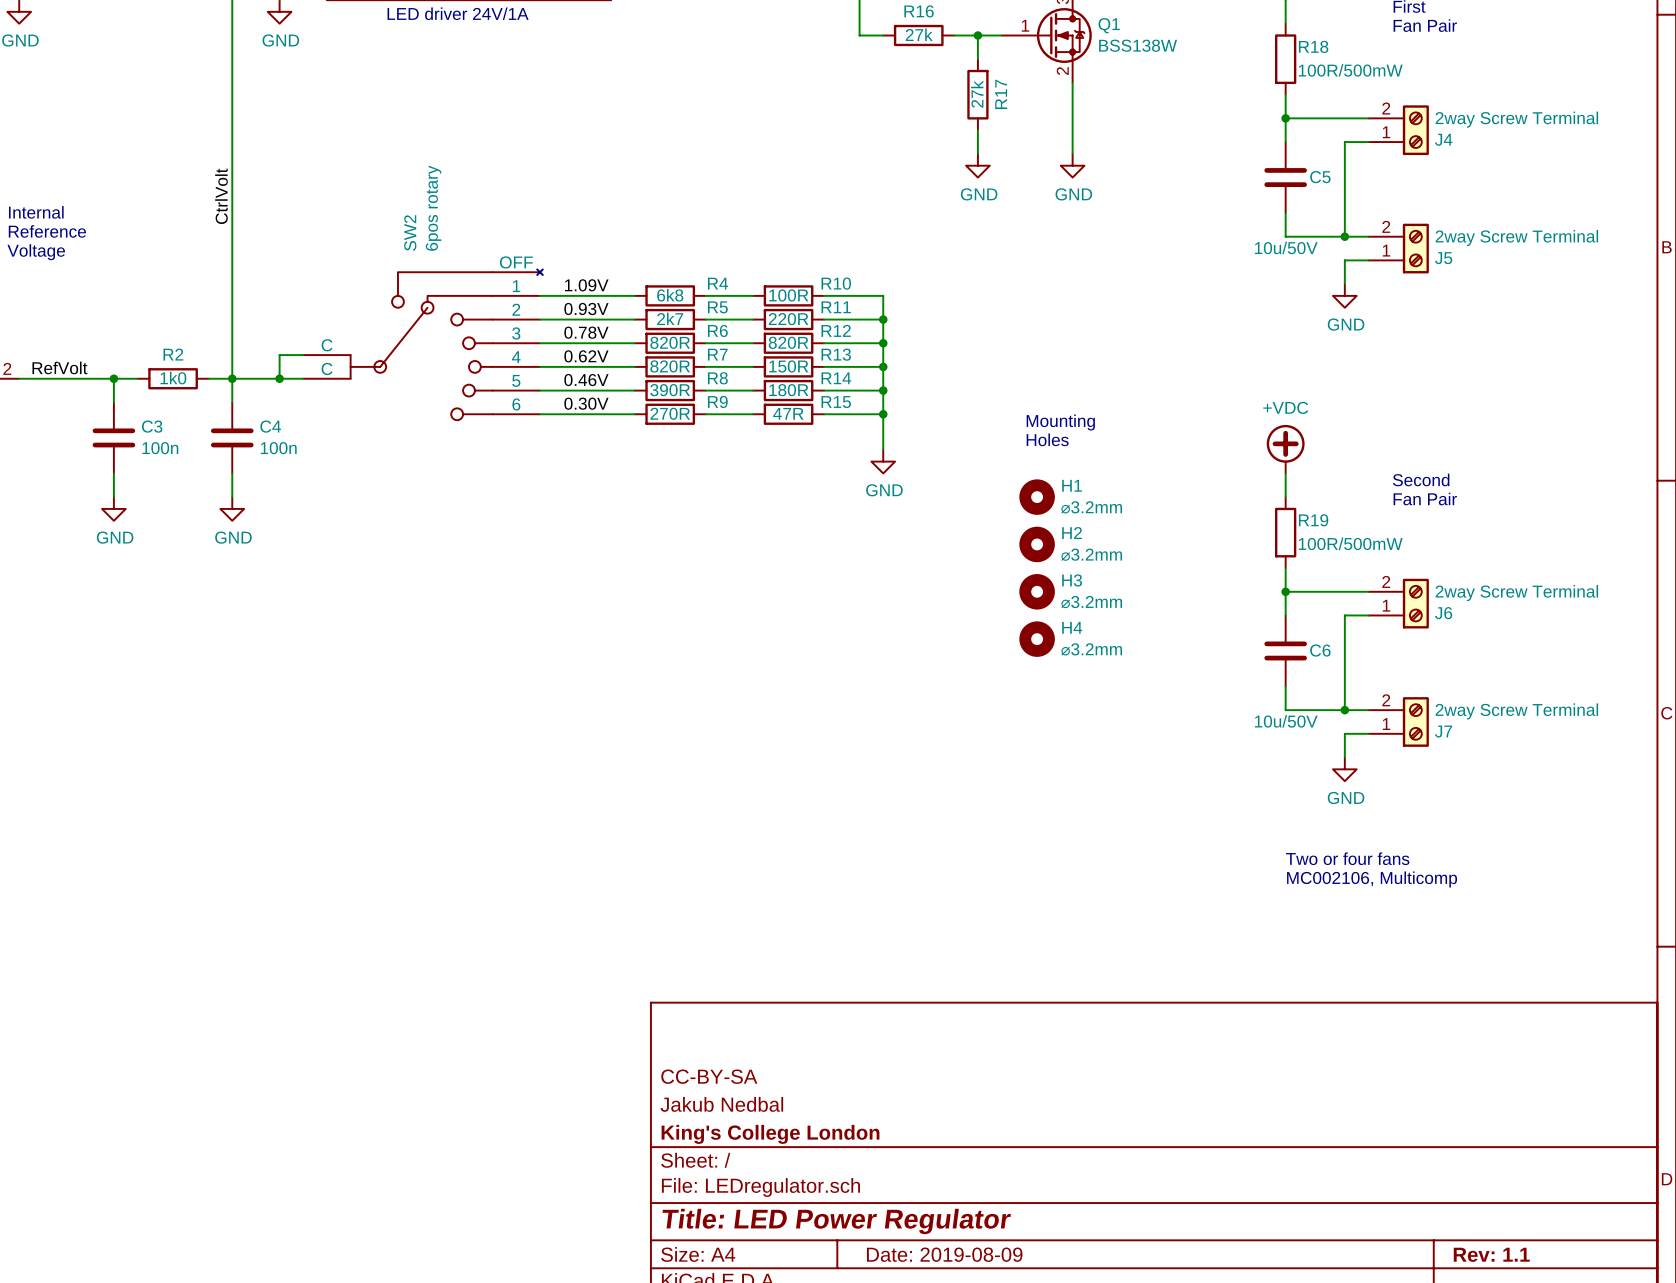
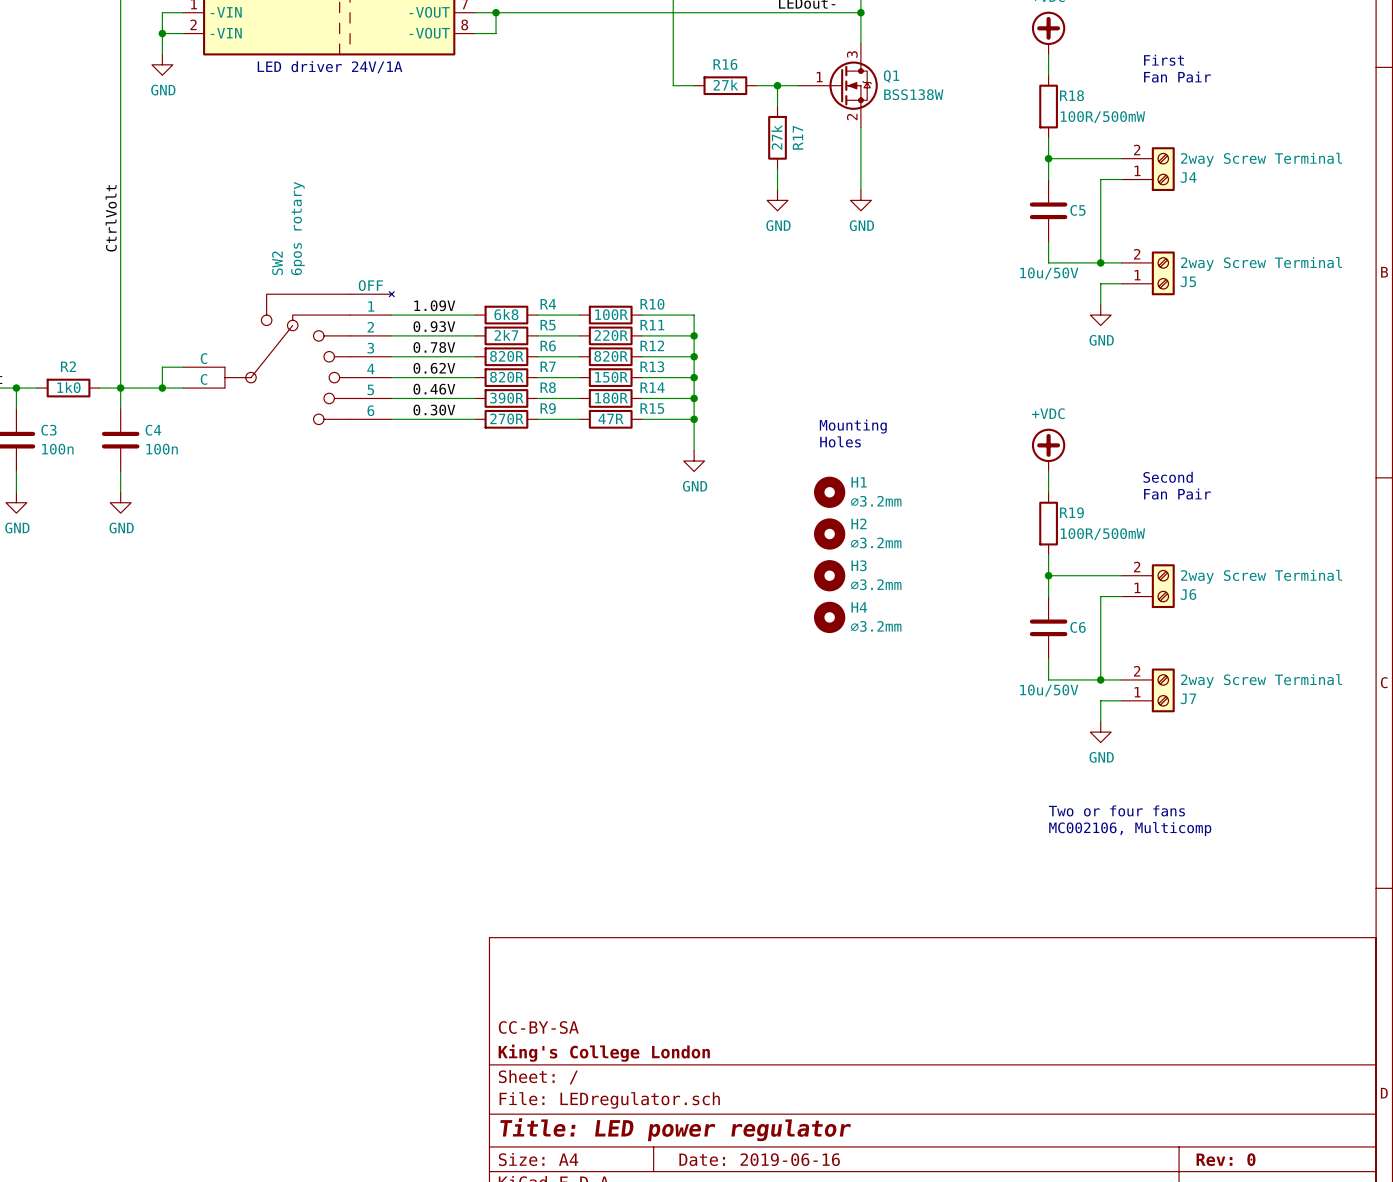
title block: CC-BY-SA (709, 1076) -> none
title block: Jakub Nedbal (721, 1104) -> CC-BY-SA (538, 1027)
title block: Title: LED Power Regulator (836, 1221) -> Title: LED power regulator (675, 1129)
title block: Date: 2019-08-09 (944, 1254) -> Date: 2019-06-16 (759, 1159)
title block: Rev: 1.1 (1491, 1254) -> Rev: 0 (1226, 1159)

